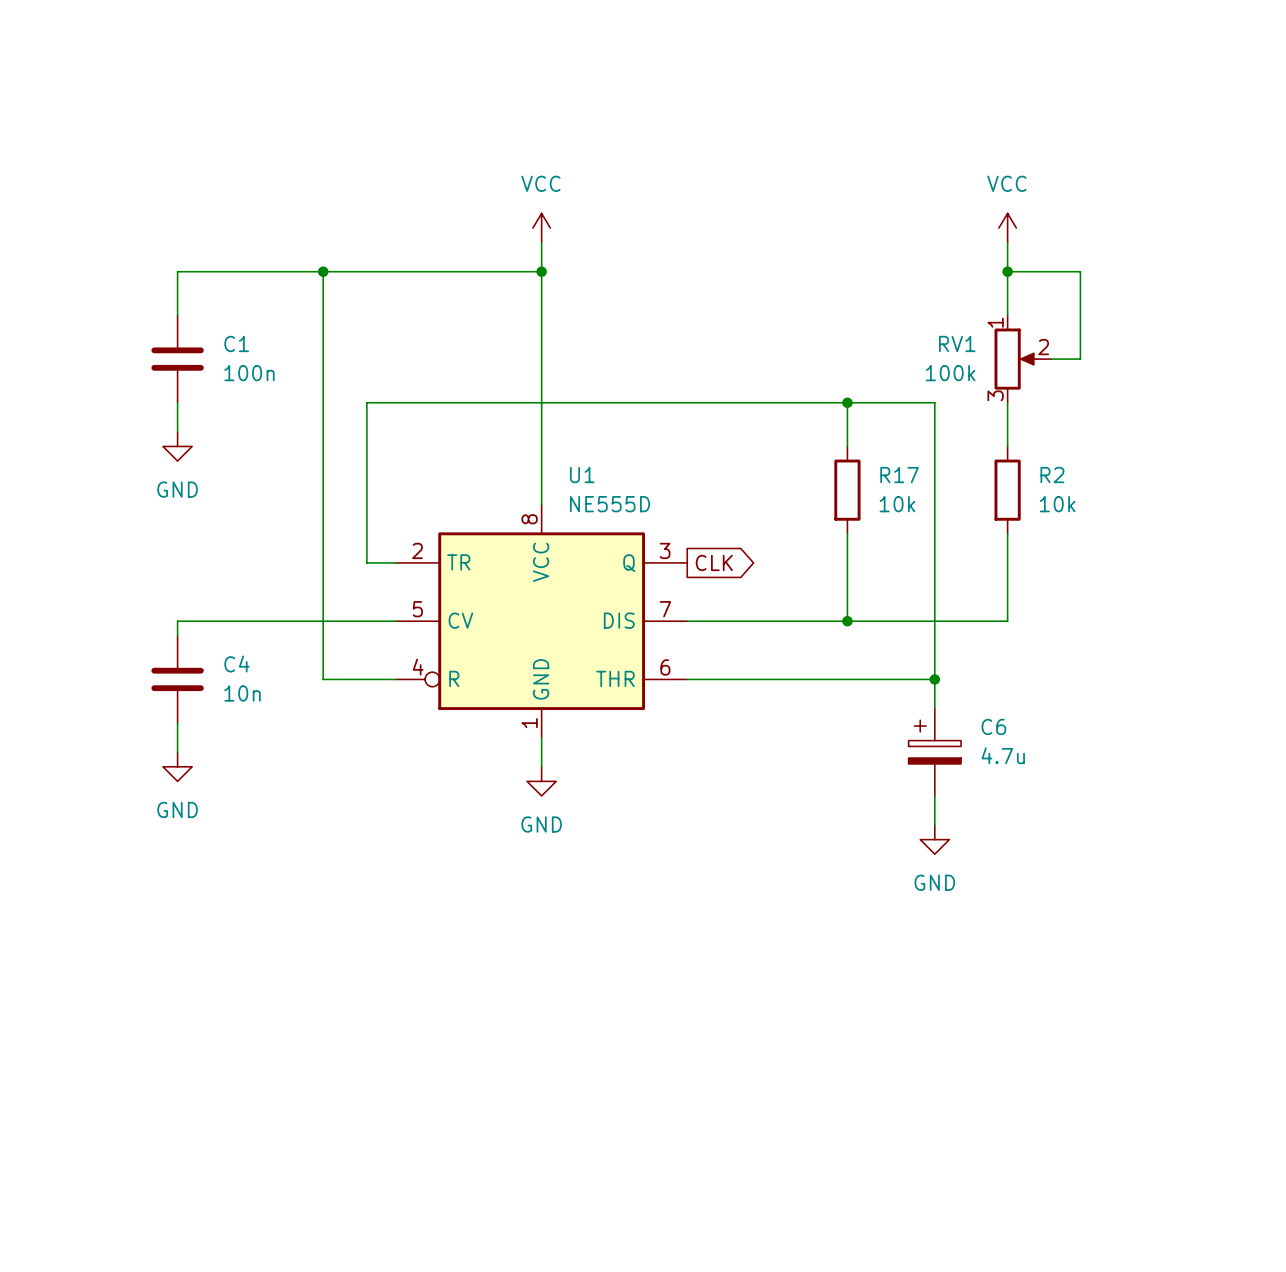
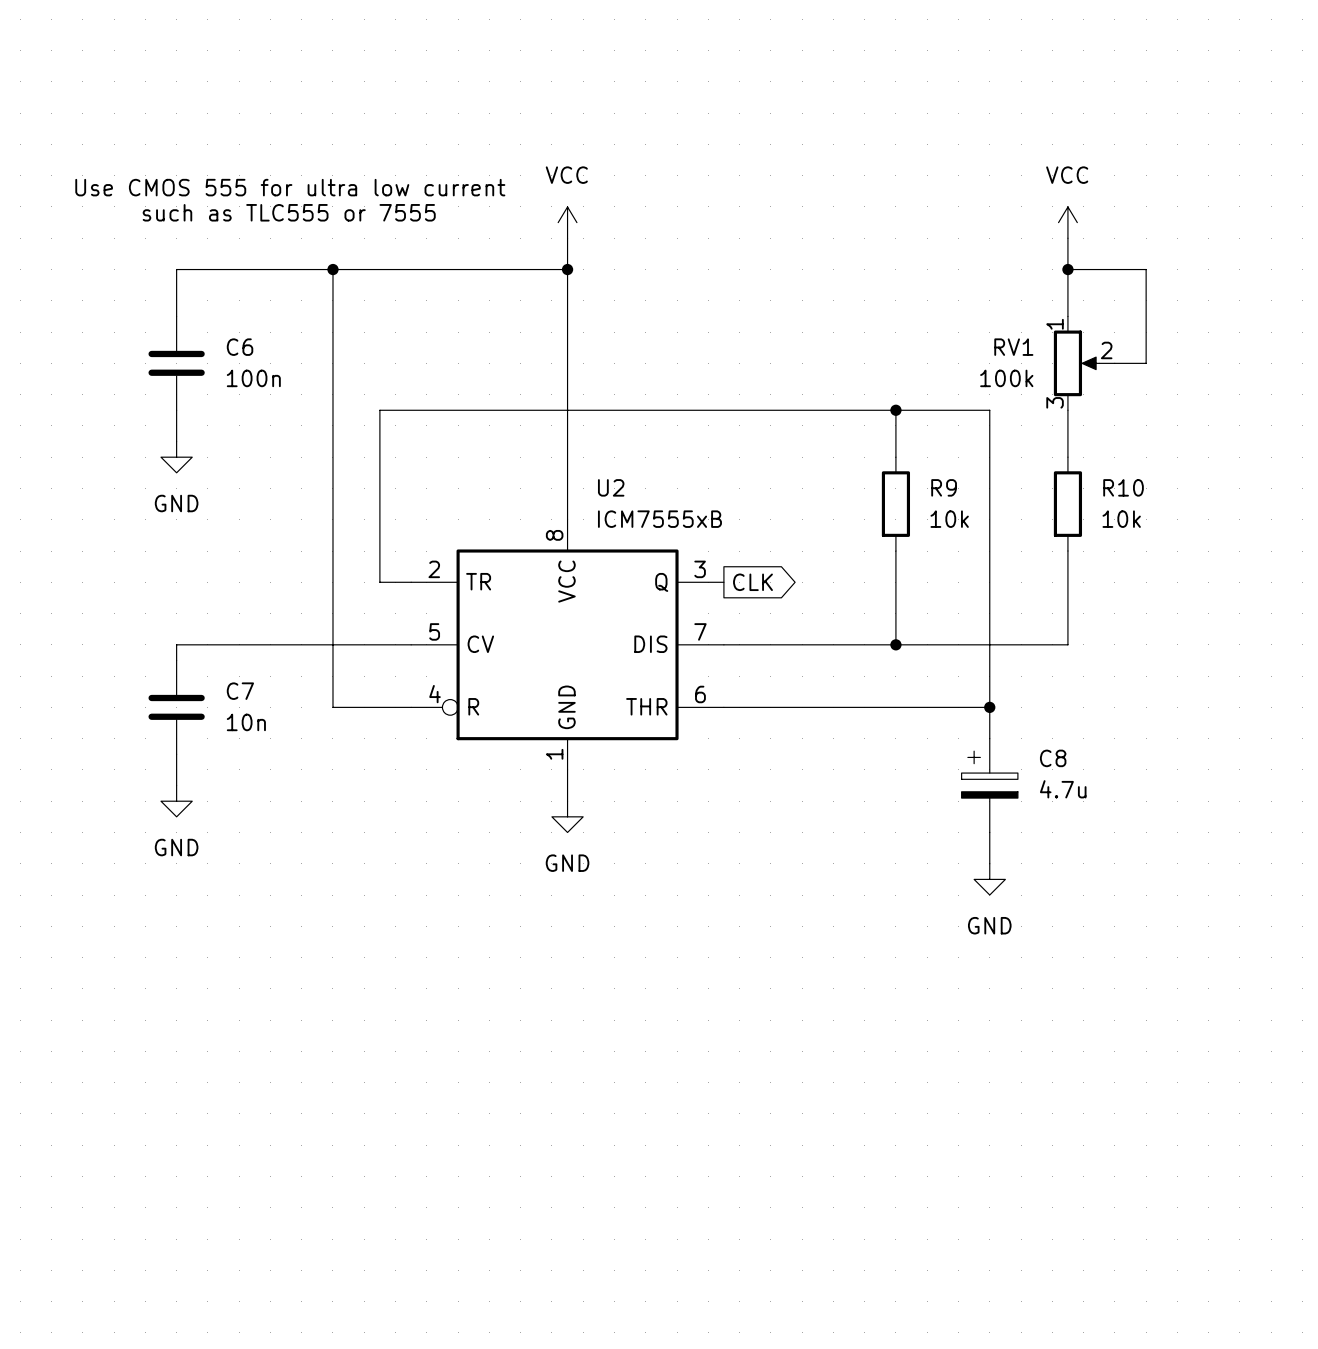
text: none -> Use CMOS 555 for ultra low current (290, 187)
text: none -> such as TLC555 or 7555 (289, 212)
C1 name: C1 (236, 343) -> C6 (240, 347)
U1 name: U1 (582, 475) -> U2 (611, 487)
R17 name: R17 (899, 475) -> R9 (944, 487)
R2 name: R2 (1052, 475) -> R10 (1123, 487)
U1 value: NE555D (610, 504) -> ICM7555xB (659, 519)
C4 name: C4 (236, 663) -> C7 (240, 691)
C6 name: C6 (993, 726) -> C8 (1053, 758)

